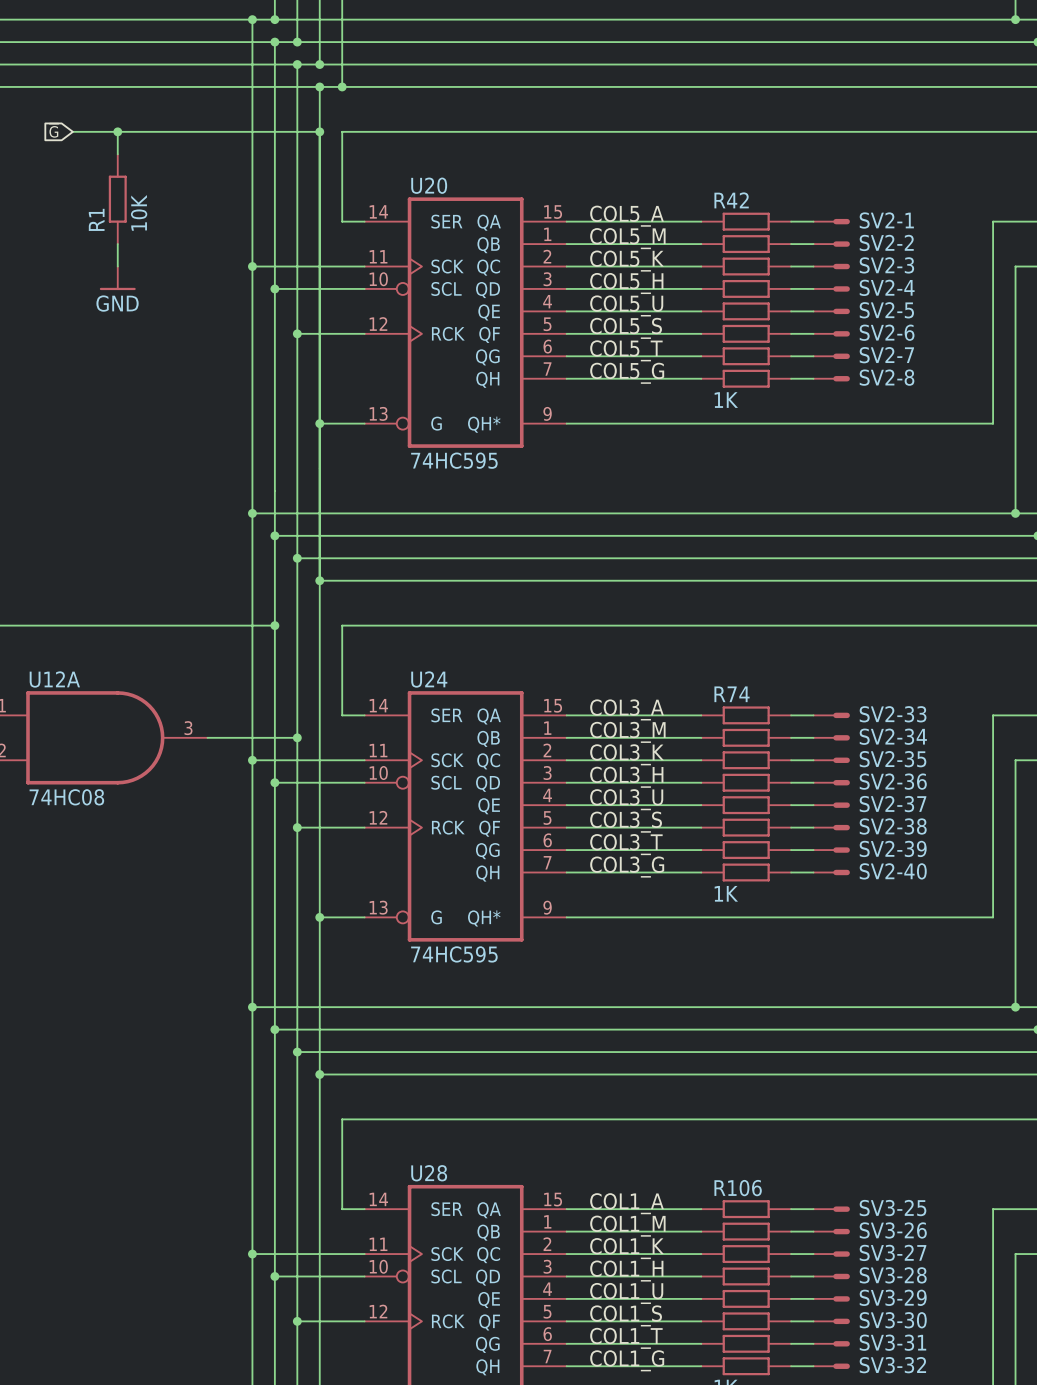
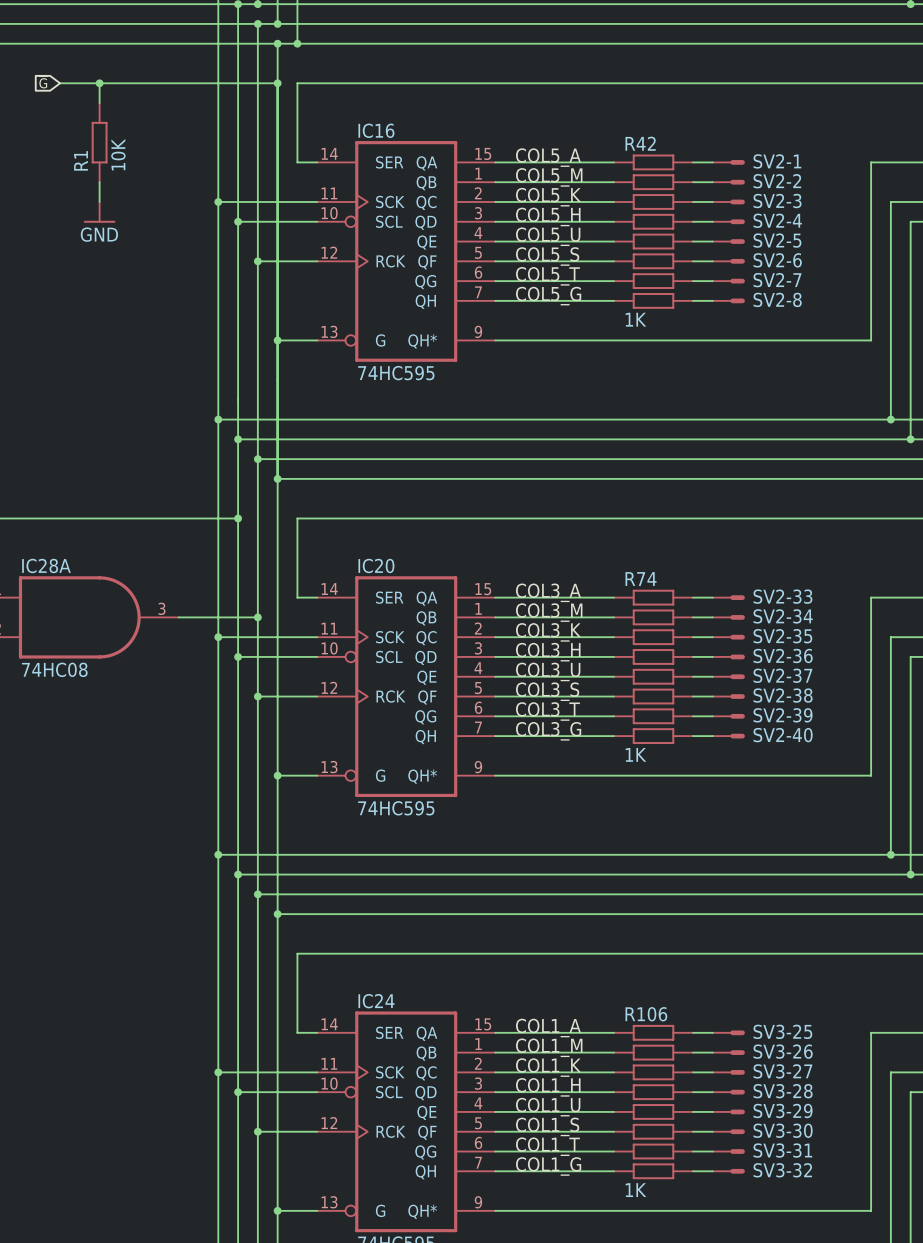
U20 name: U20 (429, 185) -> IC16 (376, 130)
U12A name: U12A (54, 679) -> IC28A (46, 565)
U24 name: U24 (429, 679) -> IC20 (376, 565)
U28 name: U28 (429, 1173) -> IC24 (376, 1001)

